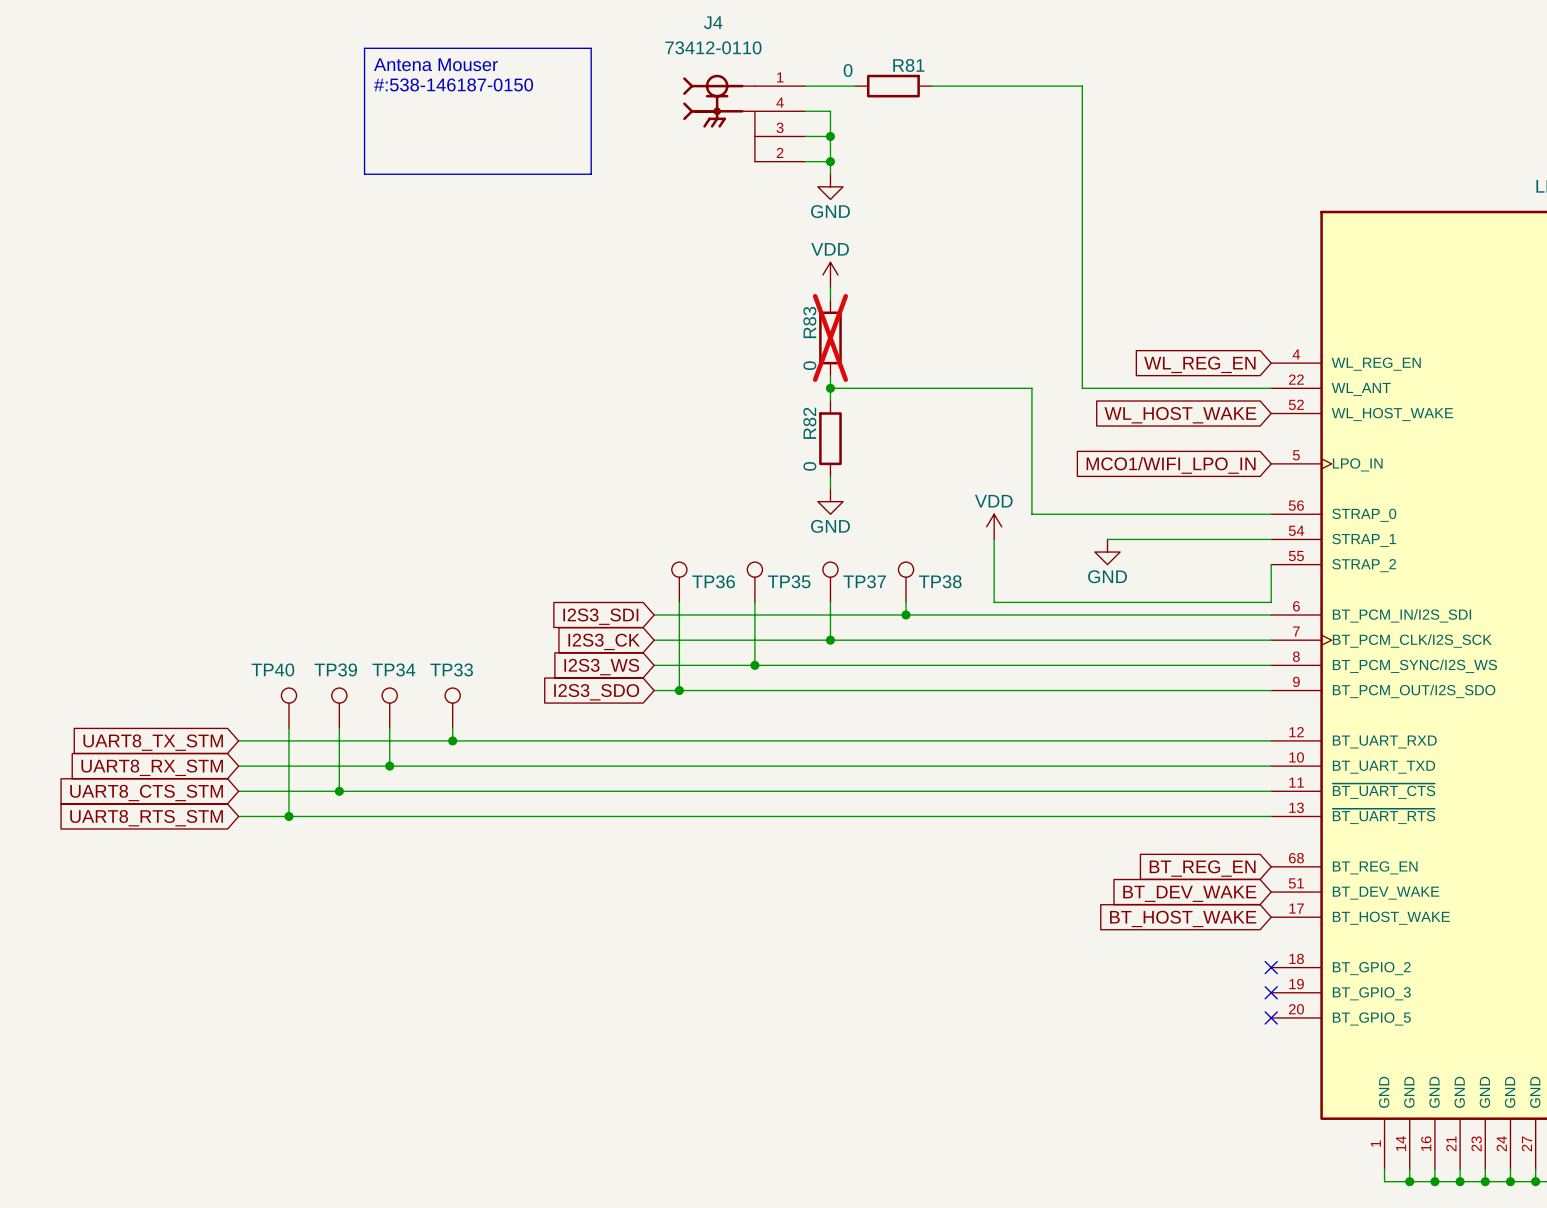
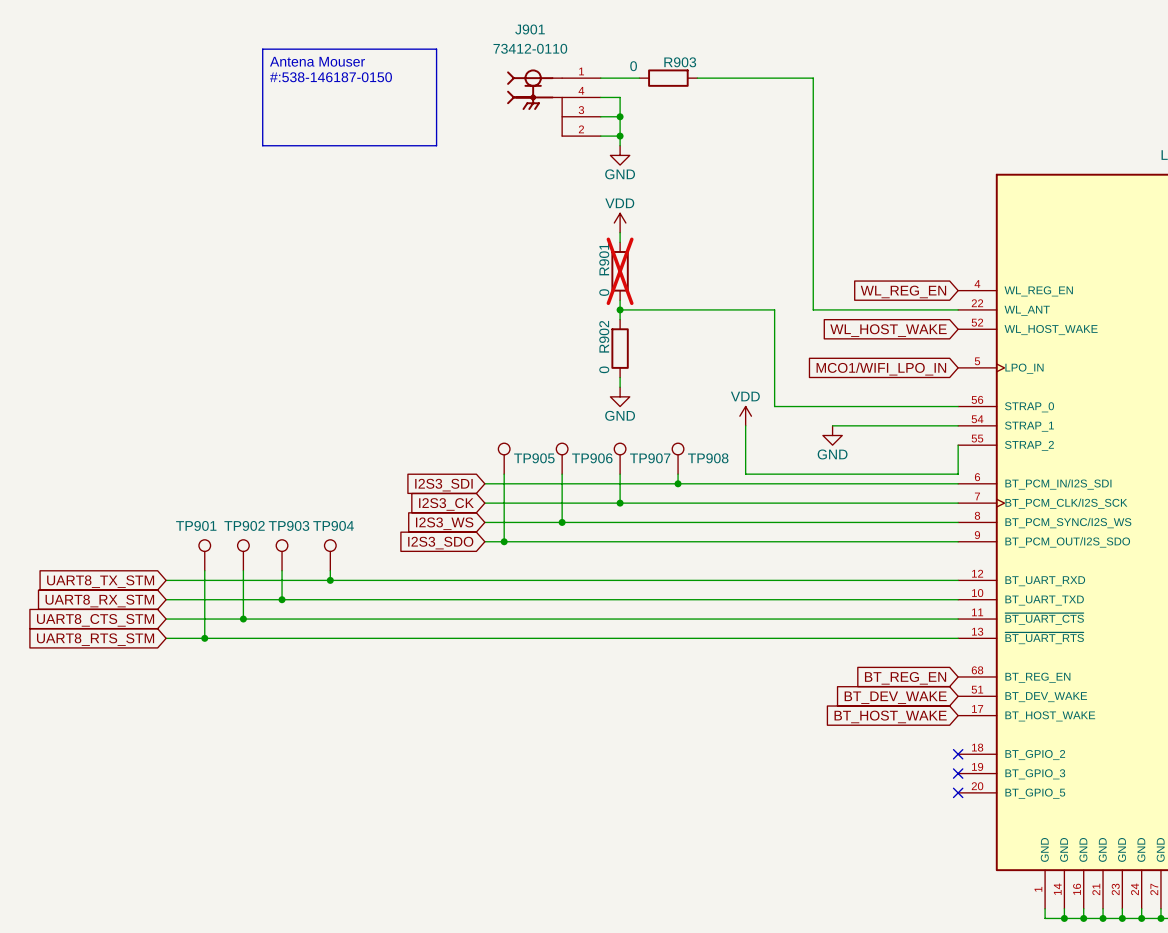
J4 name: J4 (713, 22) -> J901 (530, 29)
R81 name: R81 (908, 65) -> R903 (680, 62)
R83 name: R83 (809, 322) -> R901 (604, 259)
R82 name: R82 (809, 423) -> R902 (604, 336)
TP36 name: TP36 (713, 581) -> TP905 (534, 458)
TP35 name: TP35 (789, 581) -> TP906 (592, 458)
TP37 name: TP37 (864, 581) -> TP907 (650, 458)
TP38 name: TP38 (940, 581) -> TP908 (708, 458)
TP40 name: TP40 (272, 669) -> TP901 (196, 525)
TP39 name: TP39 (335, 669) -> TP902 (244, 525)
TP34 name: TP34 (393, 669) -> TP903 (289, 525)
TP33 name: TP33 (451, 669) -> TP904 (333, 525)

